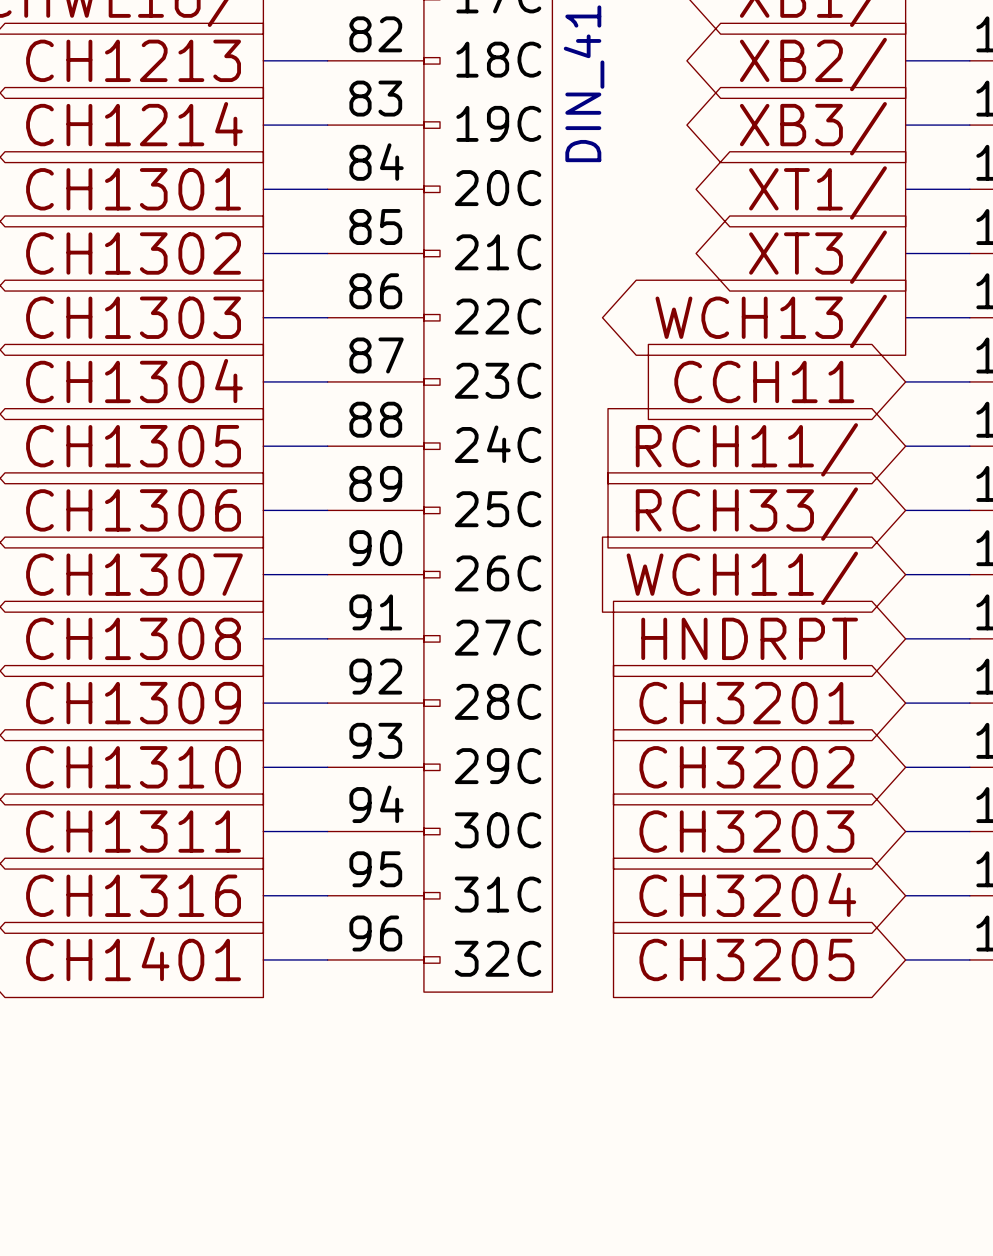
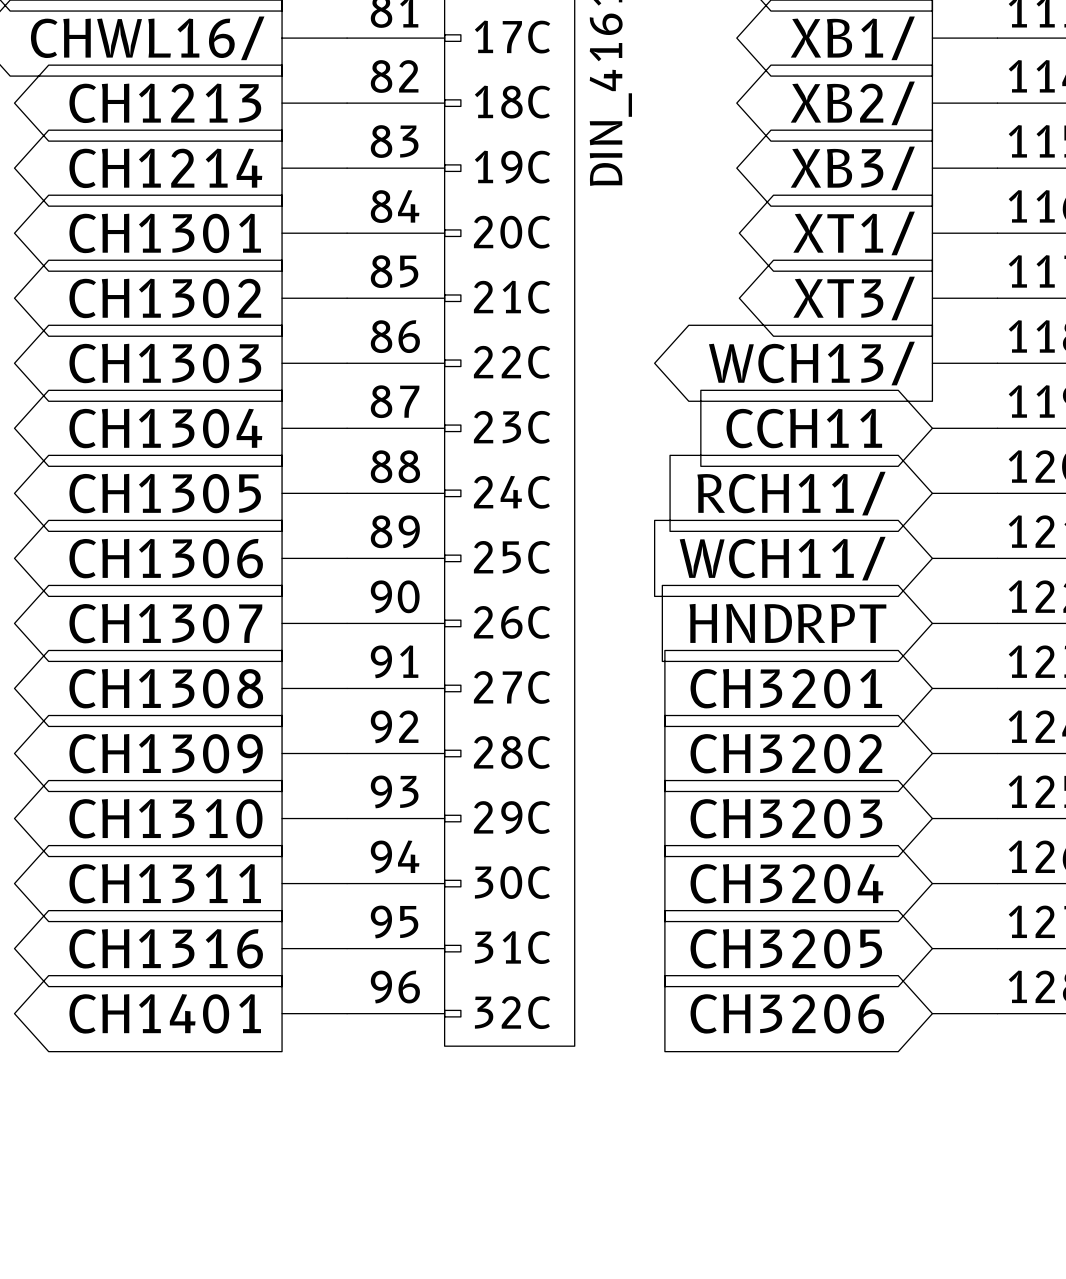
global label: RCH33/ (746, 514) -> WCH11/ (782, 558)
global label: WCH11/ (742, 578) -> HNDRPT (787, 623)
global label: HNDRPT (749, 638) -> CH3201 (786, 688)
global label: CH3201 (746, 703) -> CH3202 (786, 753)
global label: CH3202 (746, 767) -> CH3203 (786, 818)
global label: CH3203 (746, 831) -> CH3204 (786, 883)
global label: CH3204 (747, 894) -> CH3205 (786, 948)
global label: CH3205 (746, 959) -> CH3206 (787, 1013)

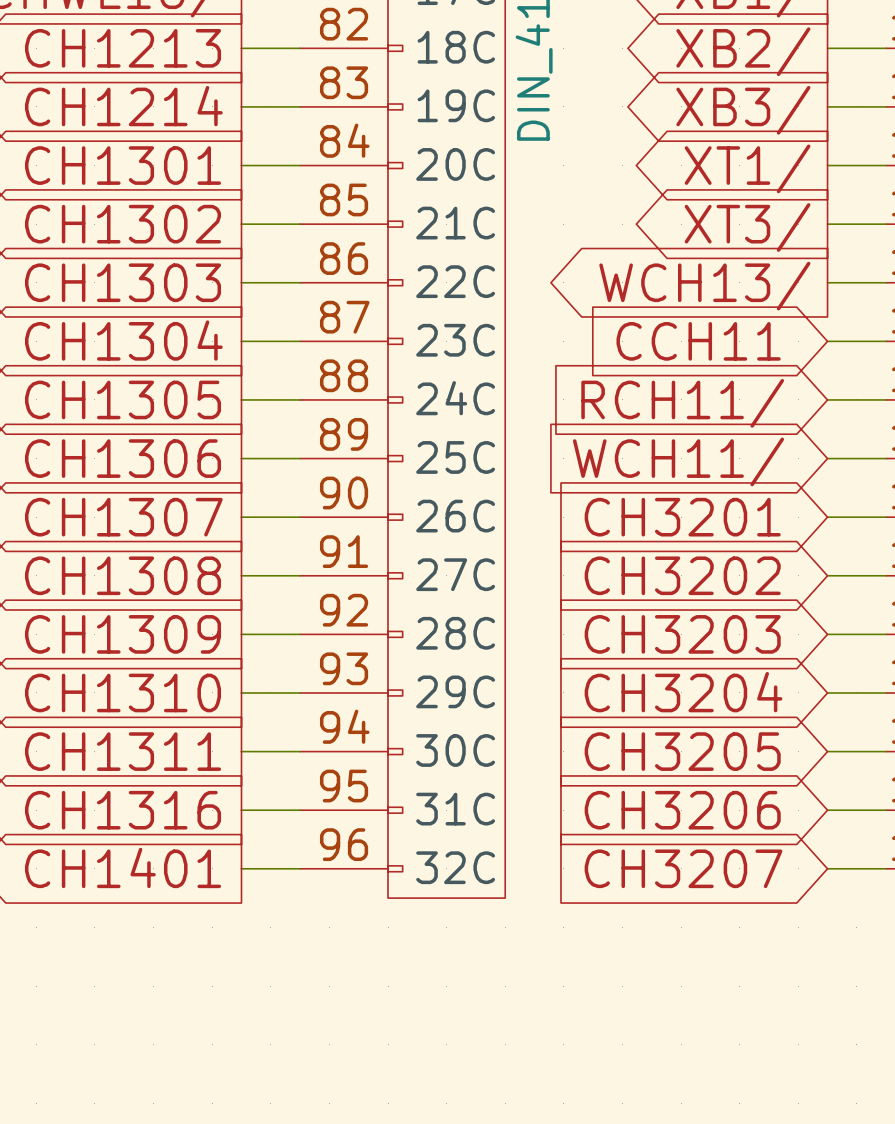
global label: HNDRPT (787, 623) -> CH3201 (682, 517)
global label: CH3201 (786, 688) -> CH3202 (682, 575)
global label: CH3202 (786, 753) -> CH3203 (682, 634)
global label: CH3203 (786, 818) -> CH3204 (683, 692)
global label: CH3204 (786, 883) -> CH3205 (682, 751)
global label: CH3205 (786, 948) -> CH3206 (682, 810)
global label: CH3206 (787, 1013) -> CH3207 (683, 868)

